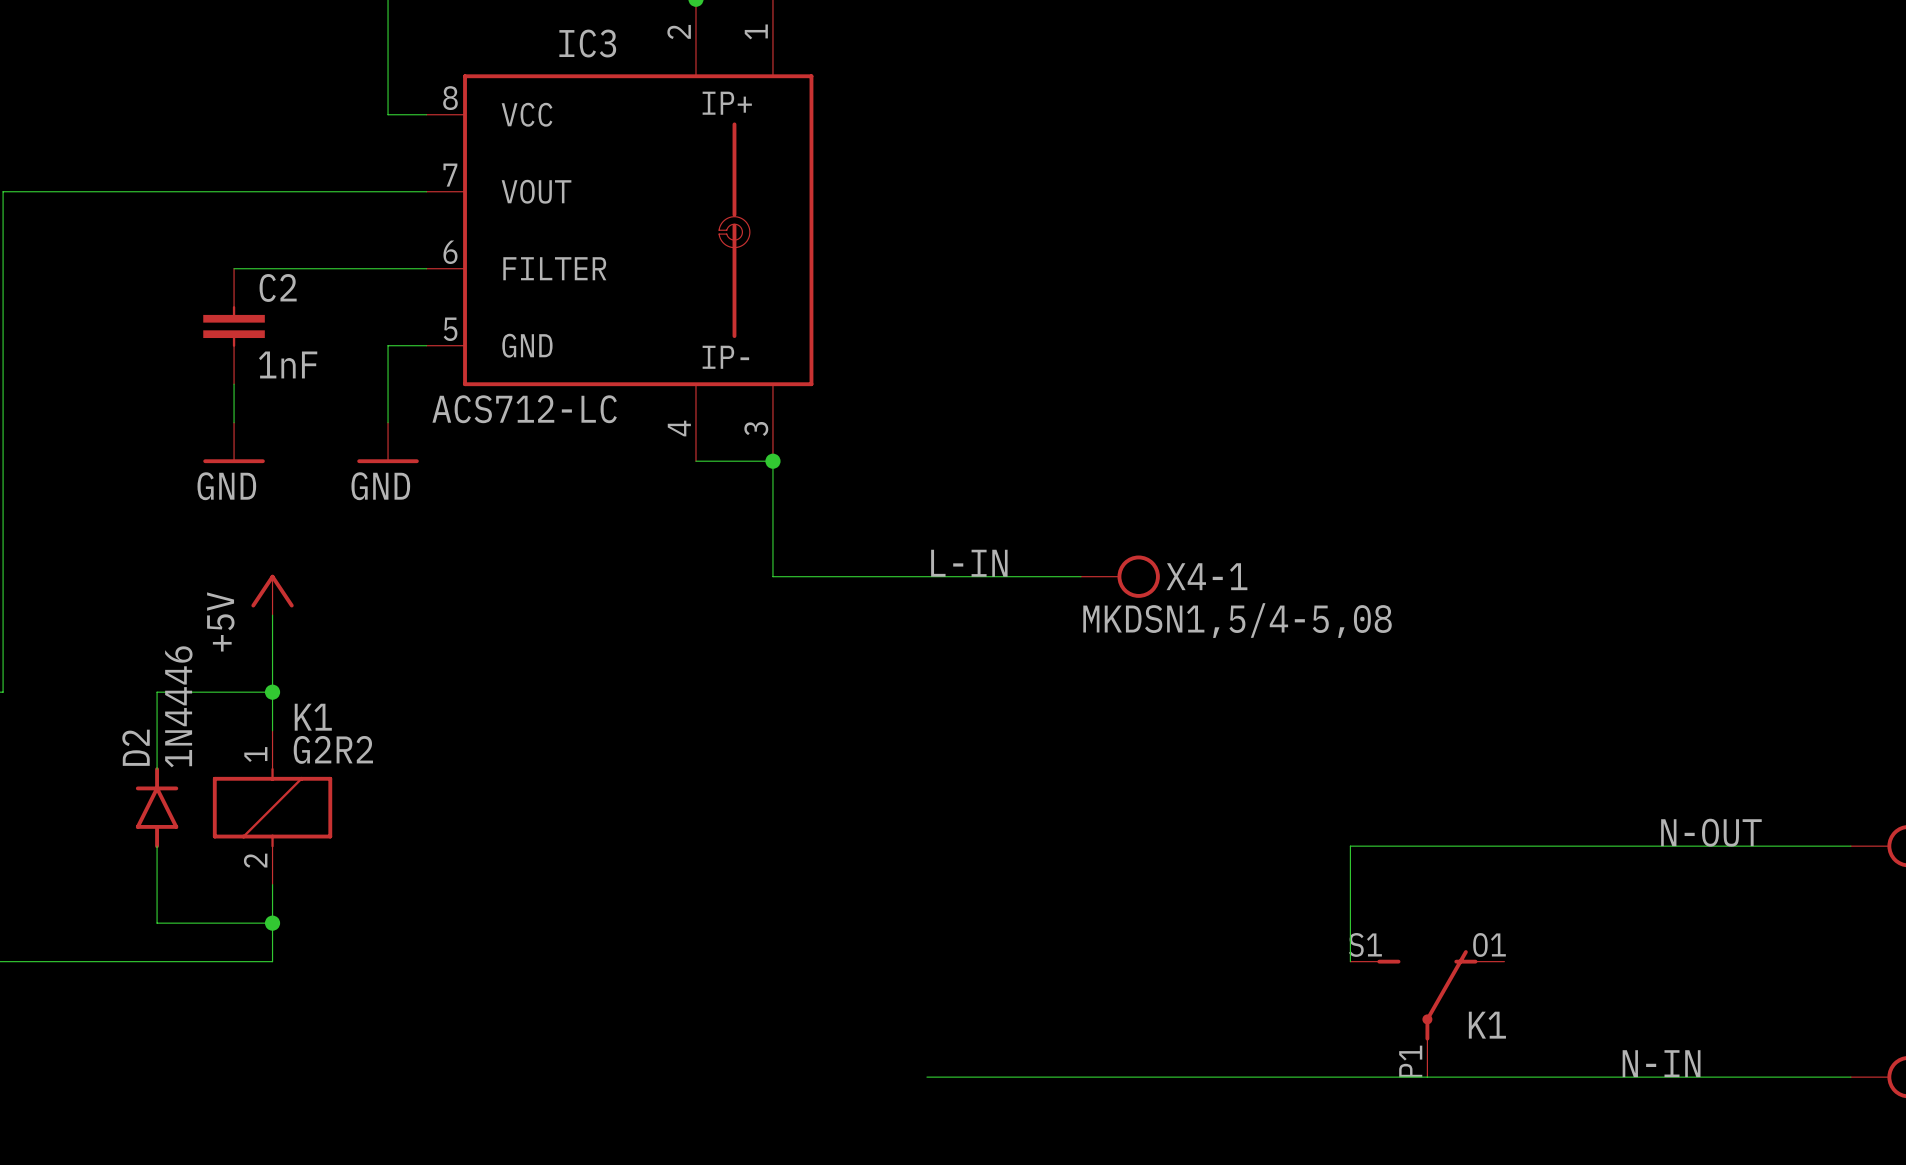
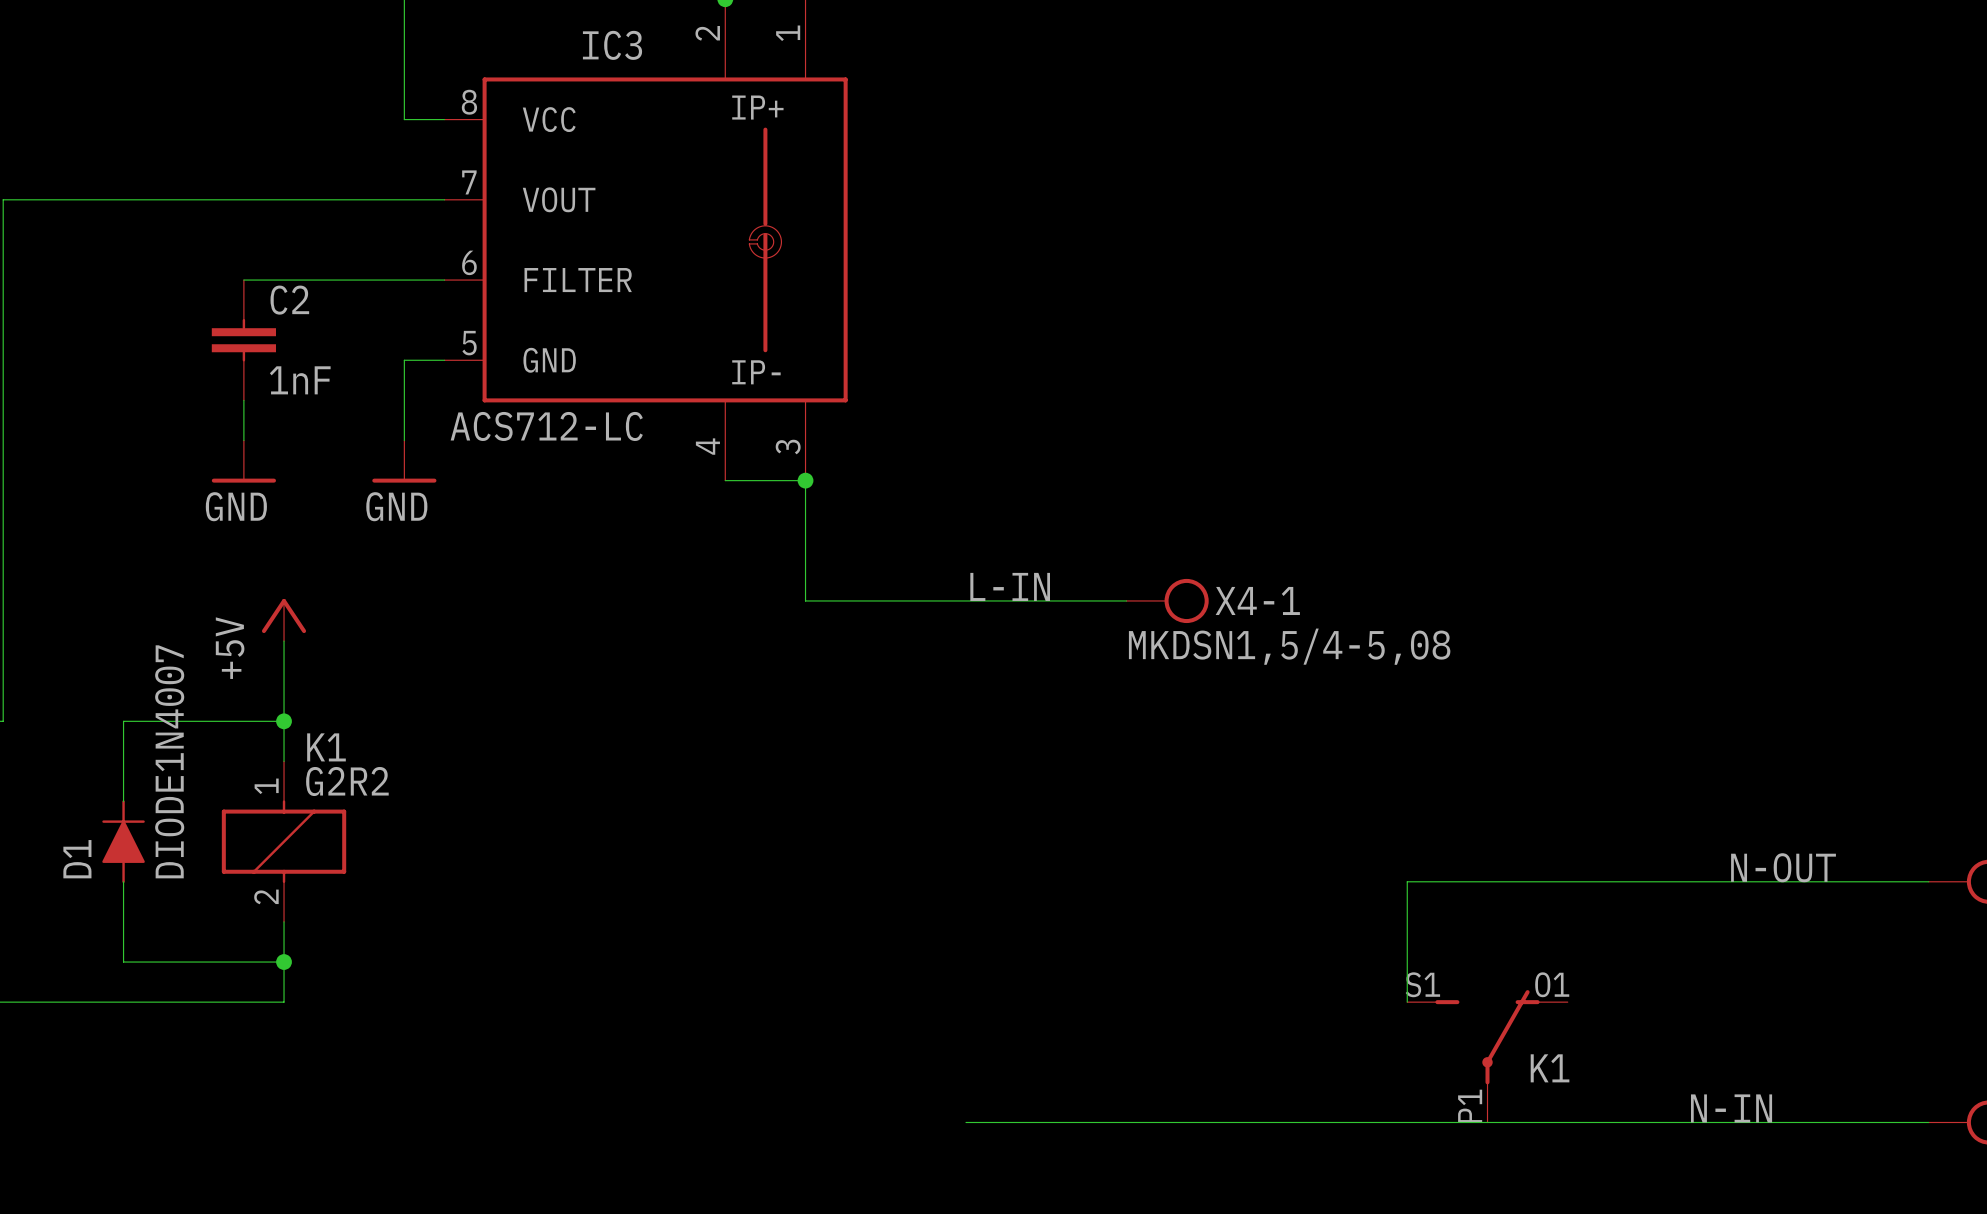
wire: (157, 692) (157, 769) -> (163, 721) (123, 721) (123, 801)
D1: none -> DIODE1N4007 (123, 841)
D2: 1N4446 (157, 807) -> none
wire: (157, 846) (157, 923) -> (123, 881) (123, 962) (163, 962)

